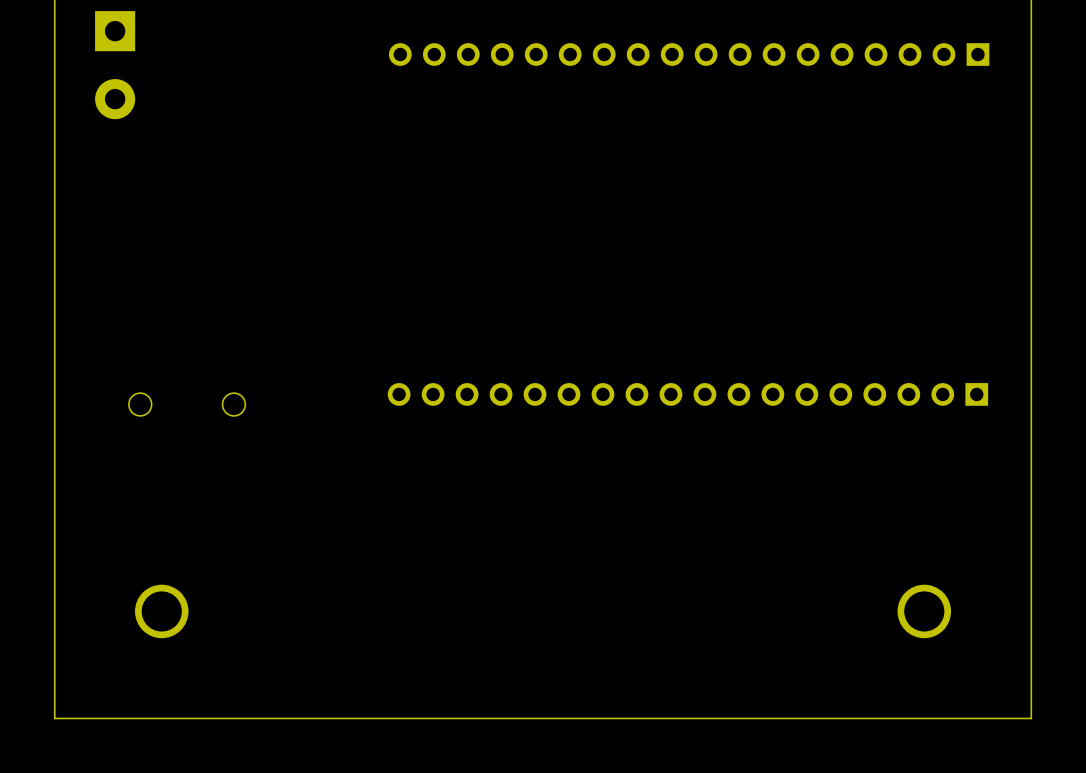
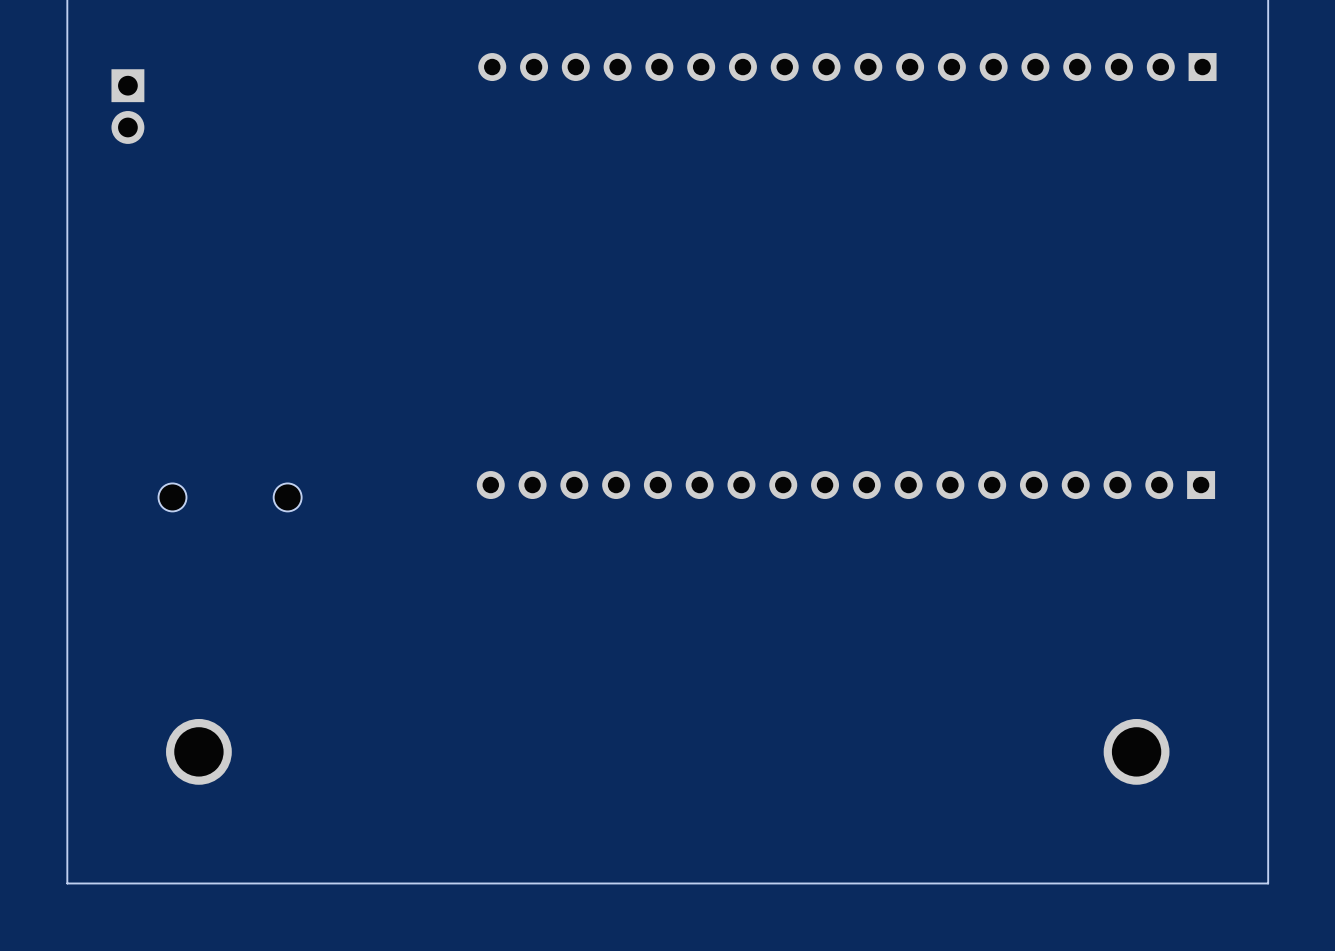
part: (115, 65) -> none
part: none -> (127, 106)

